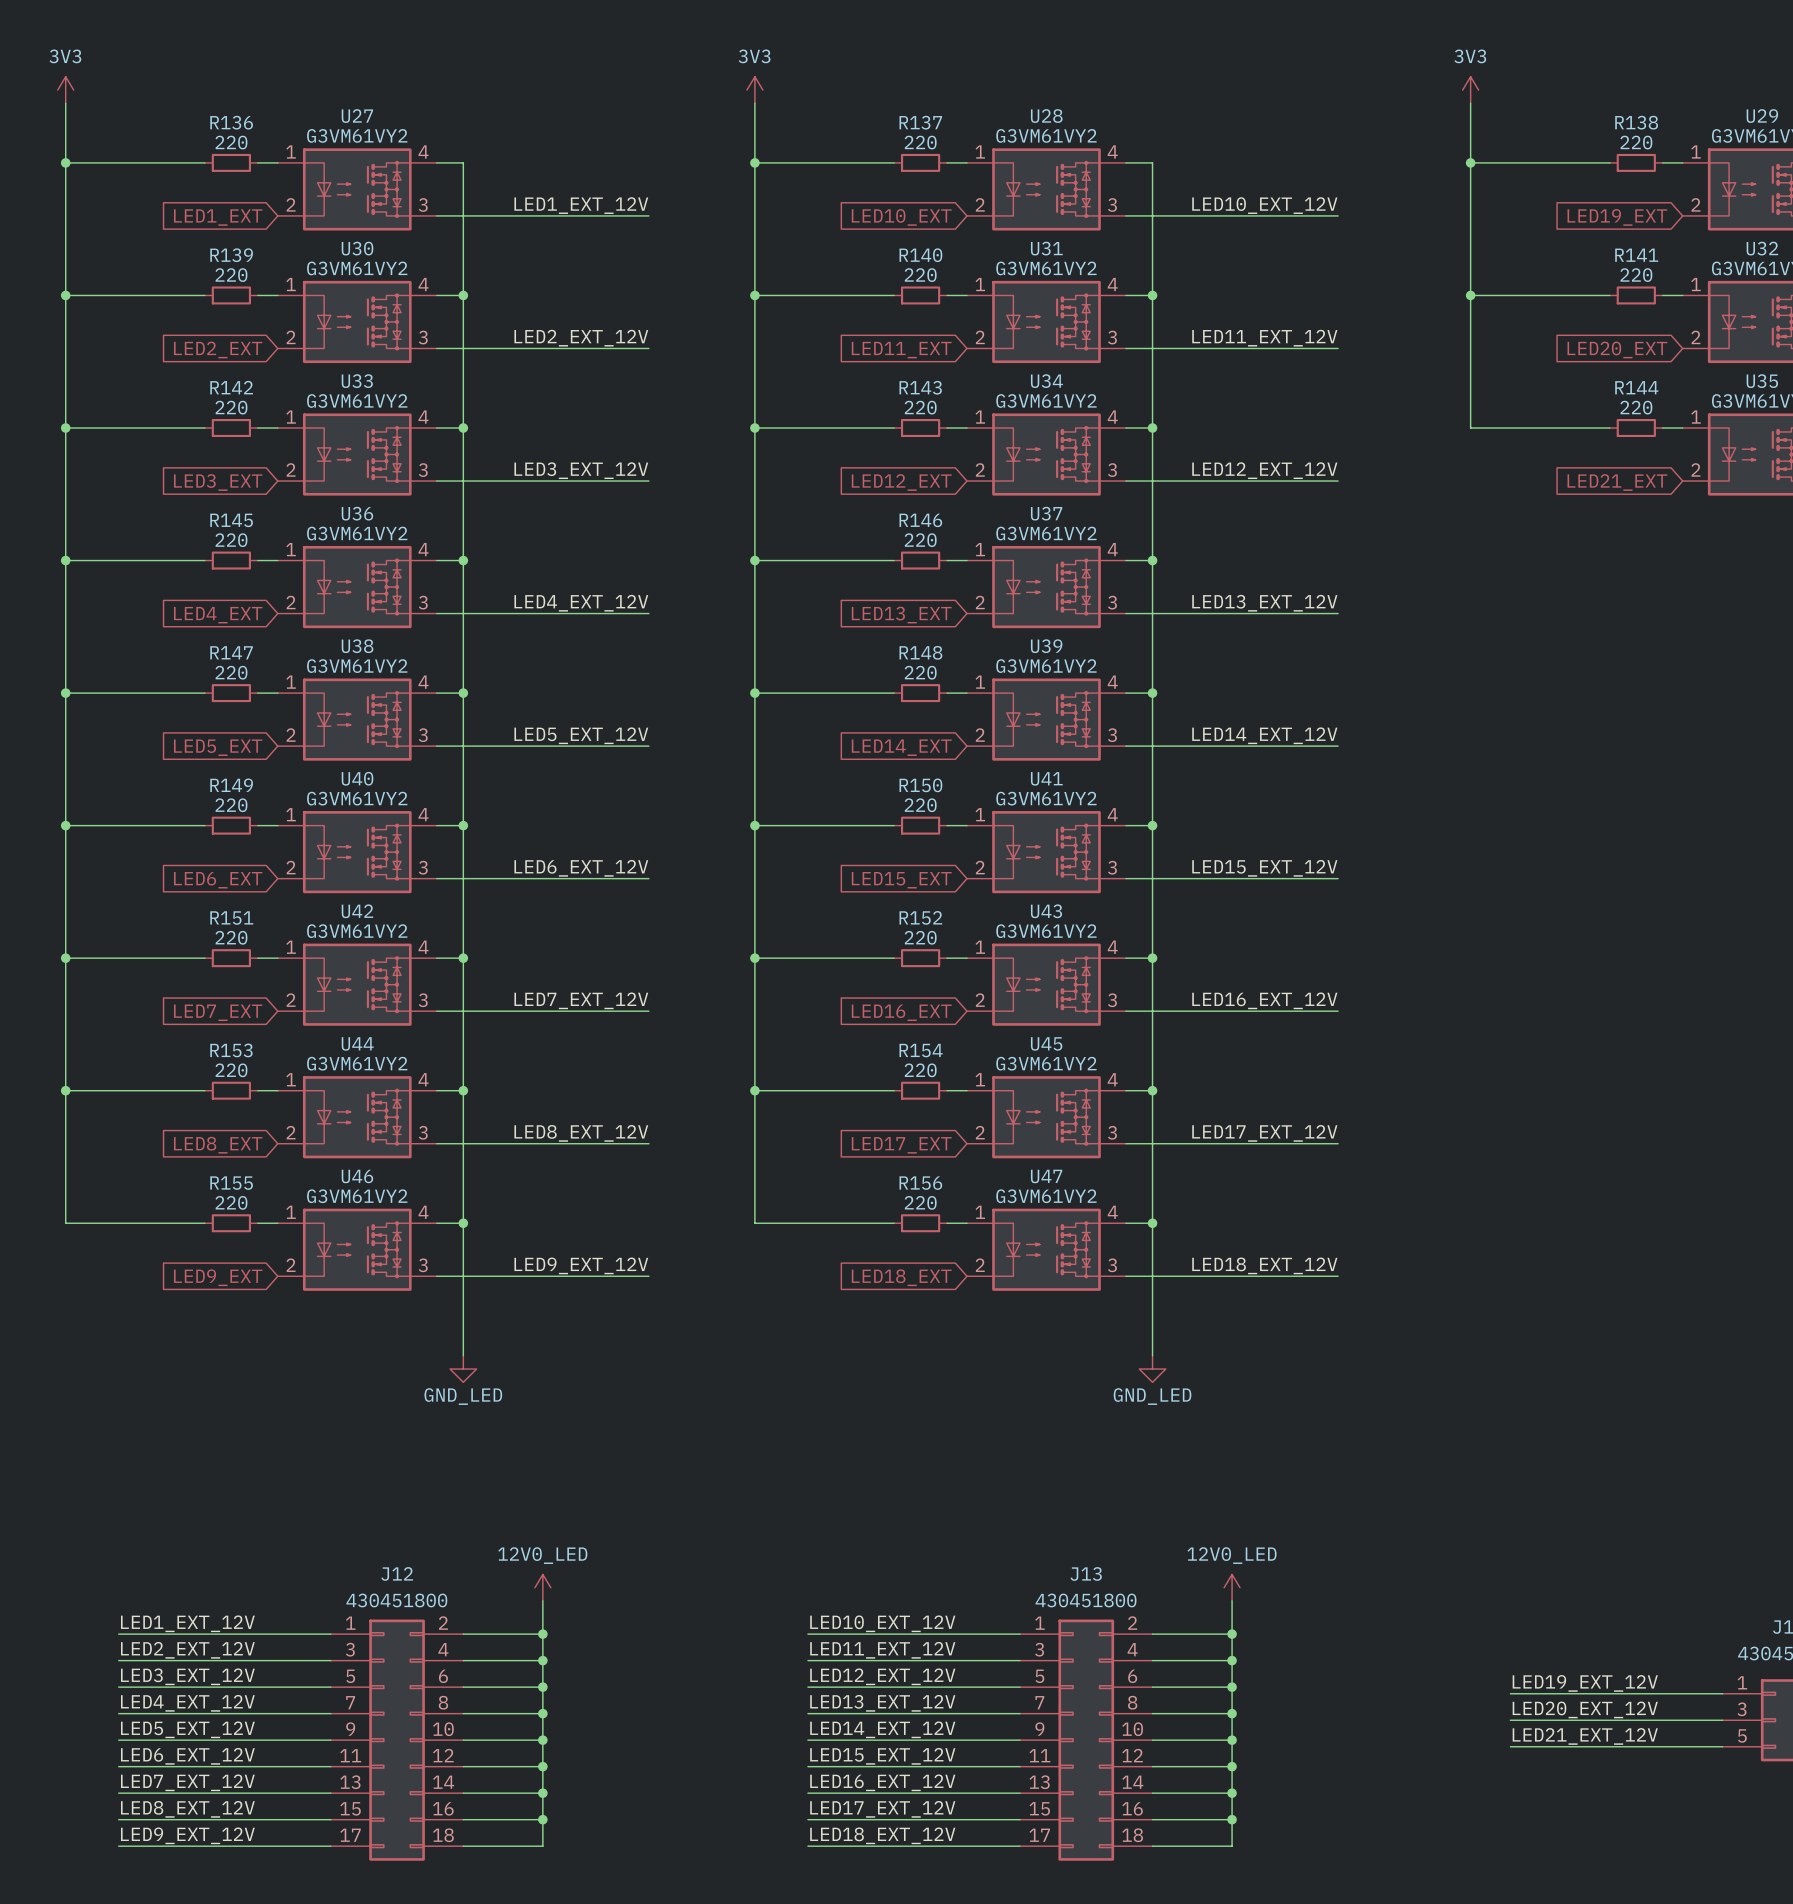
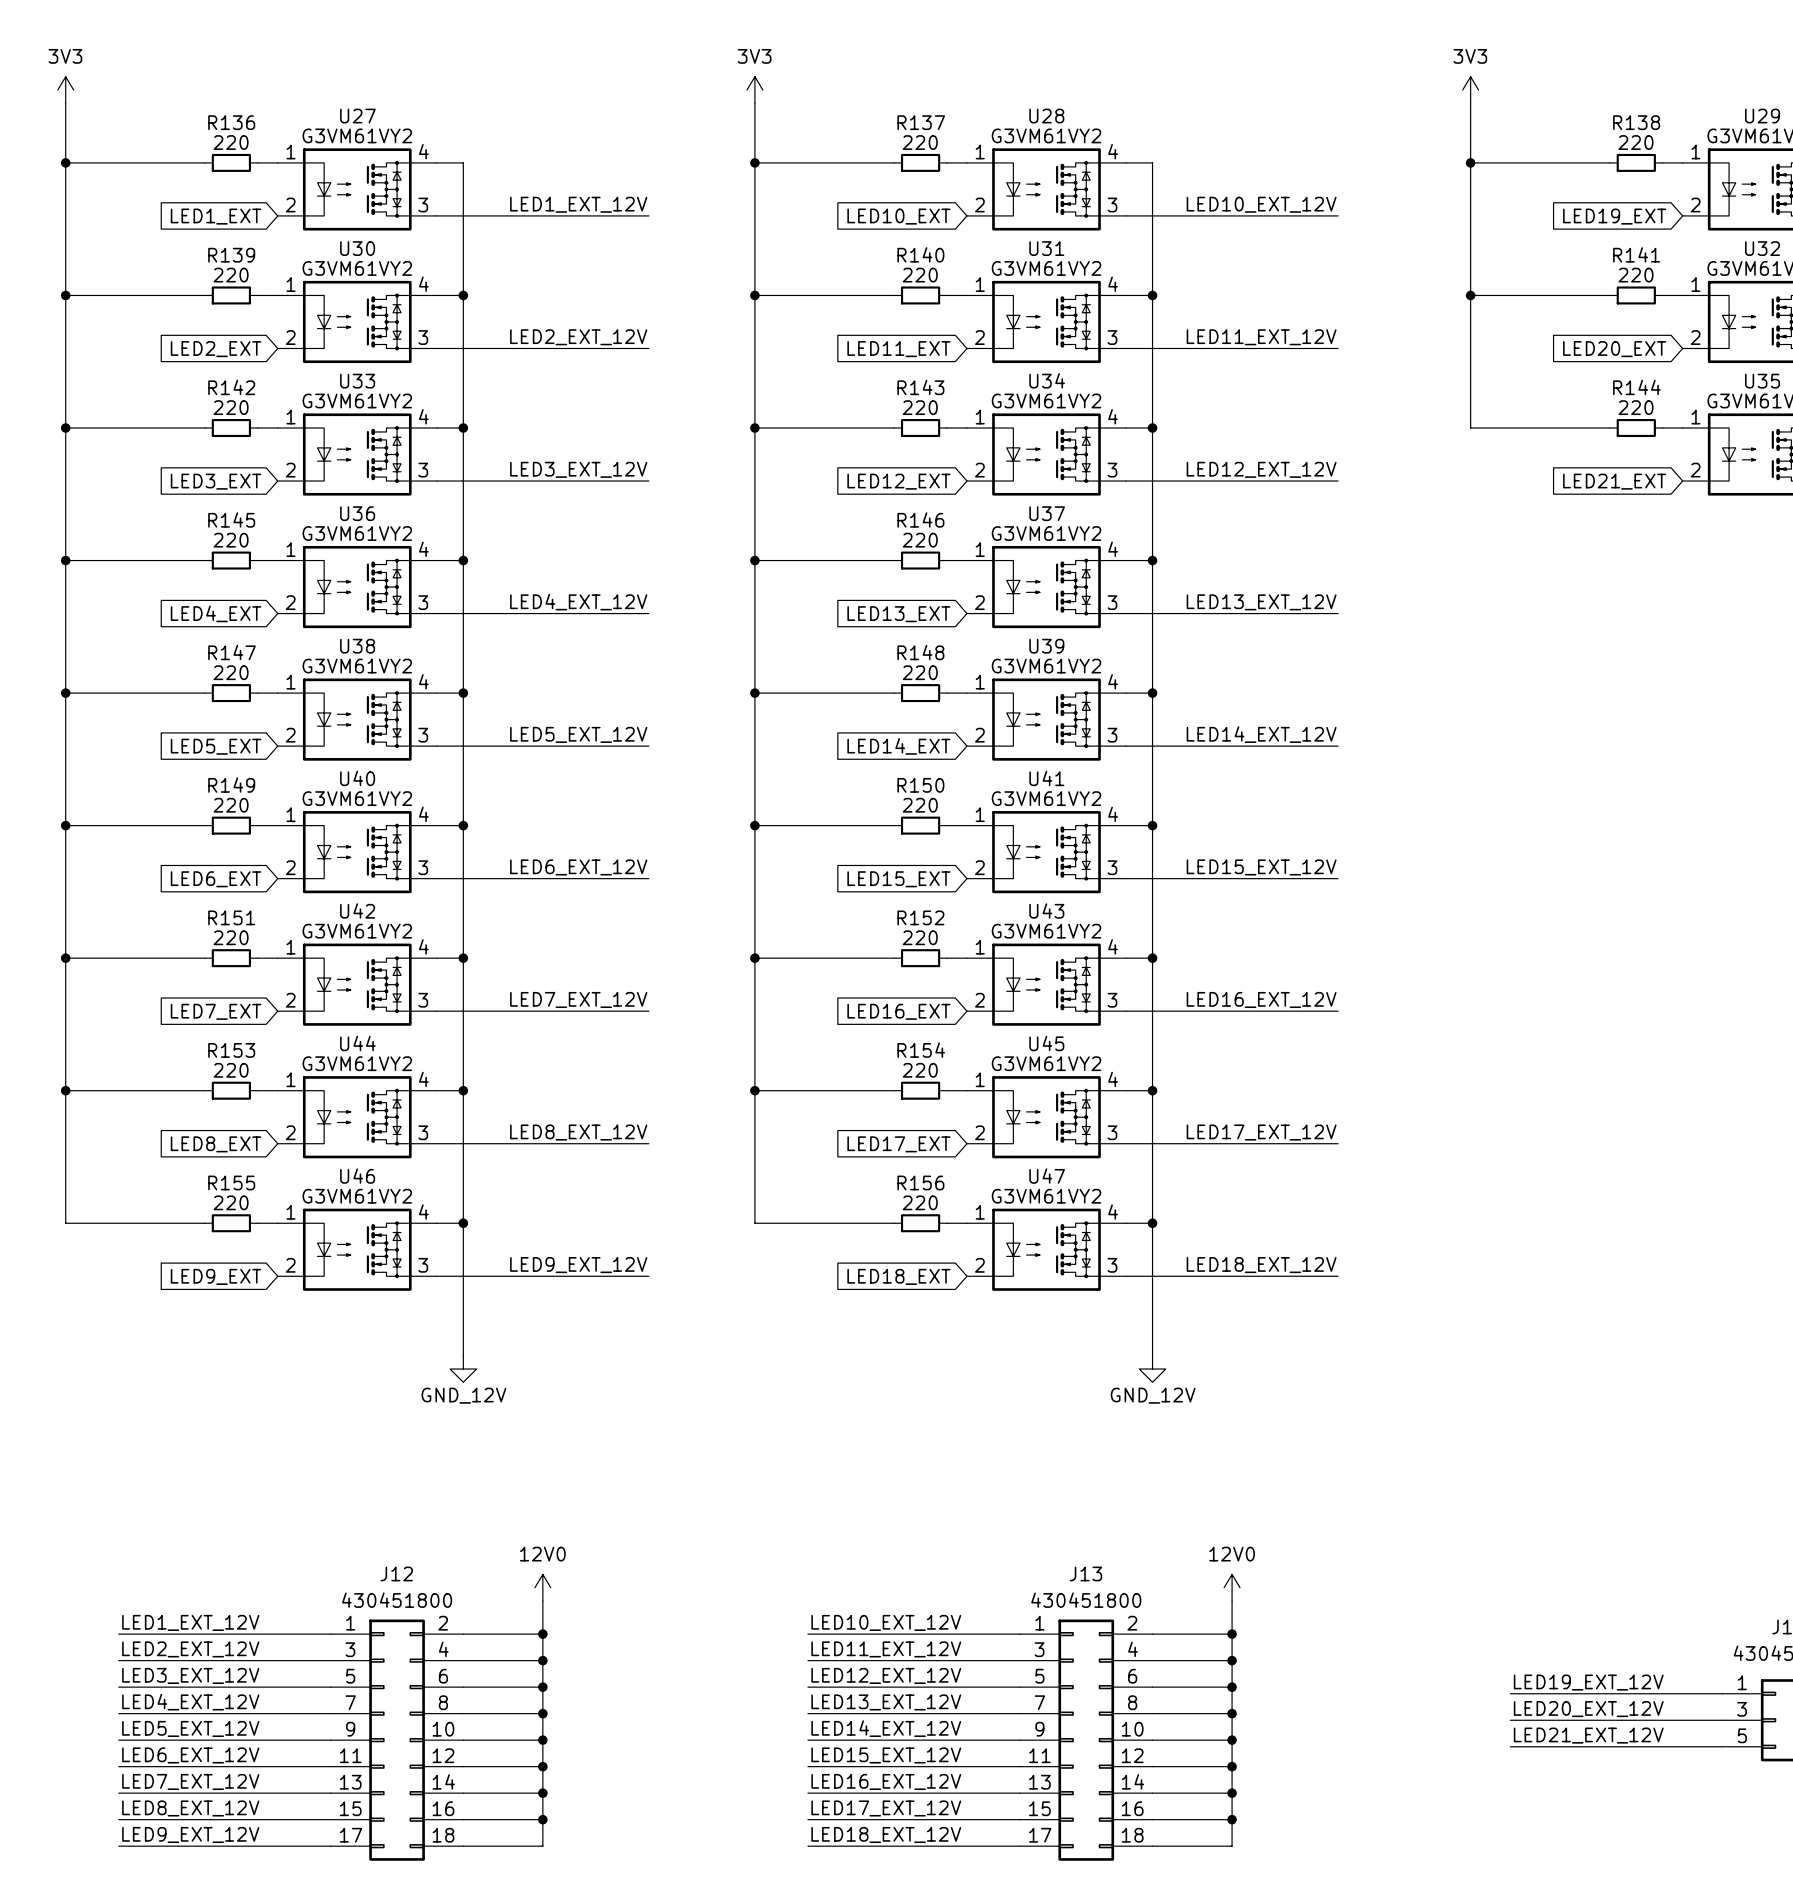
power symbol: GND_LED (463, 1369) -> GND_12V (463, 1369)
power symbol: GND_LED (1152, 1369) -> GND_12V (1152, 1369)
power symbol: 12V0_LED (542, 1587) -> 12V0 (542, 1587)
power symbol: 12V0_LED (1232, 1587) -> 12V0 (1232, 1587)

